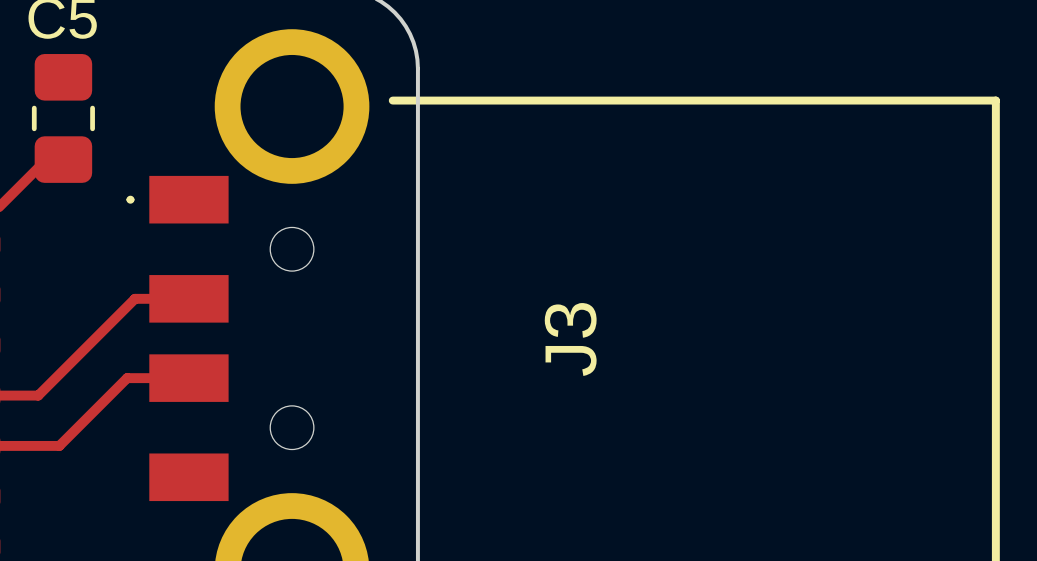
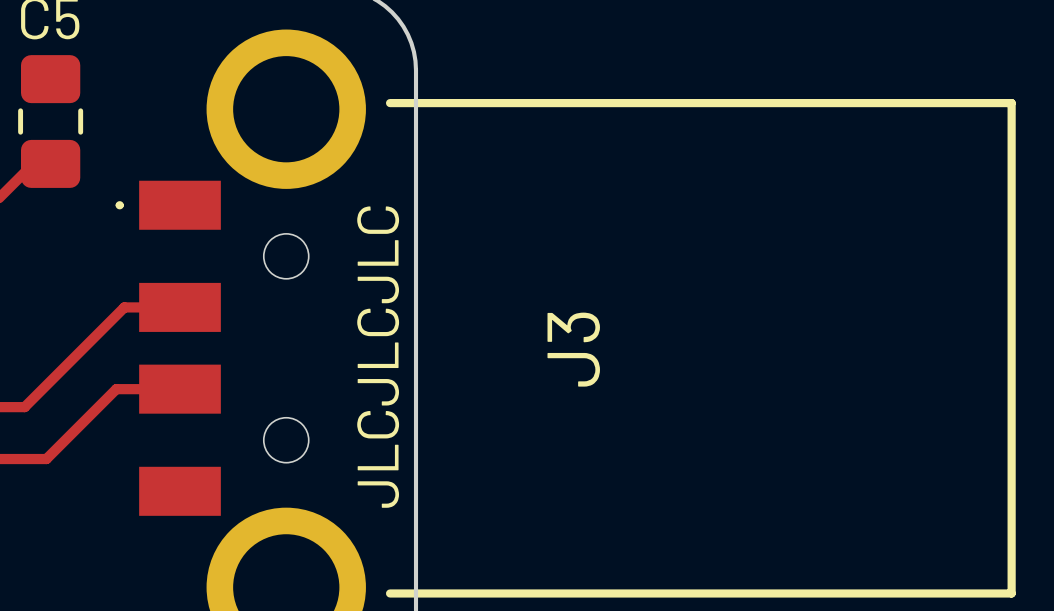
text: none -> JLCJLCJLC (378, 357)

